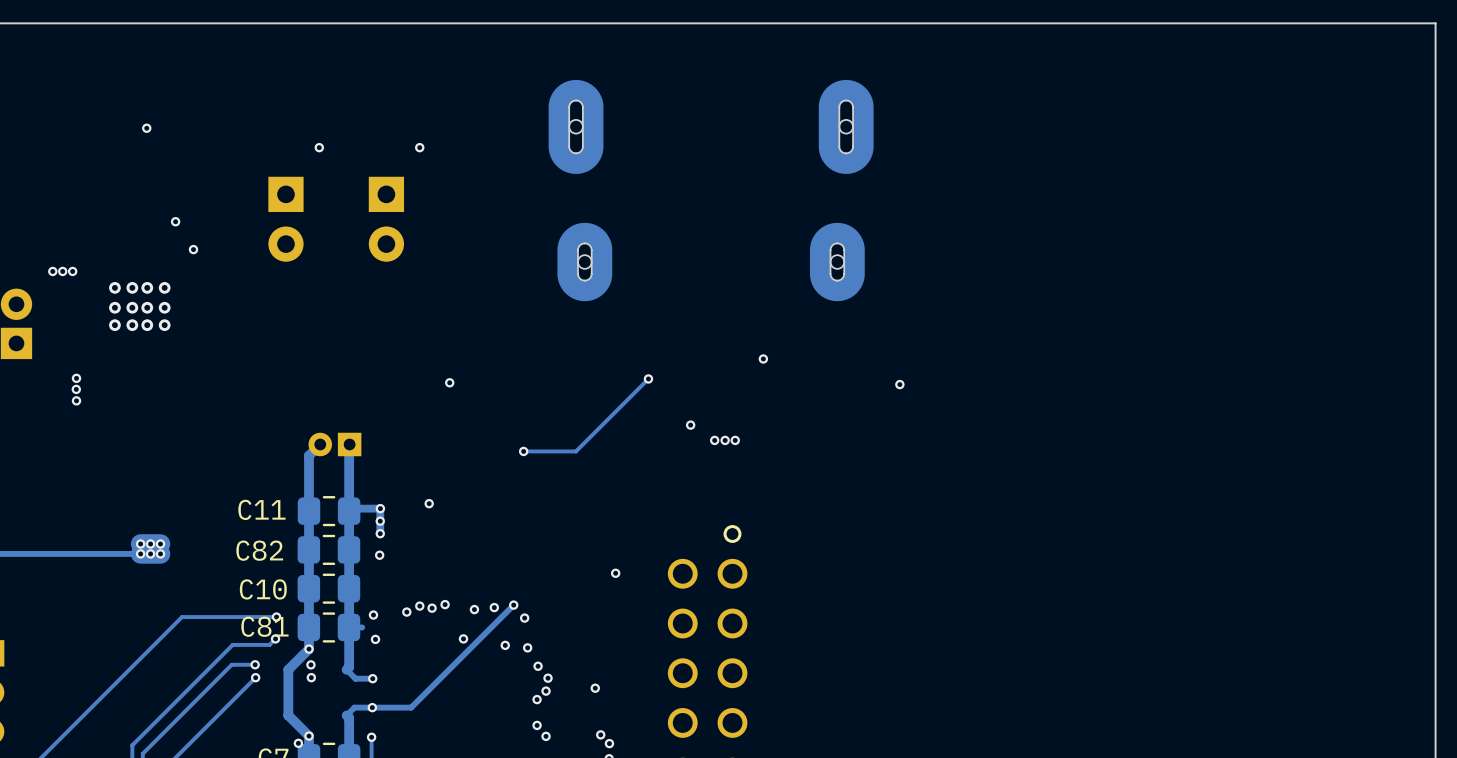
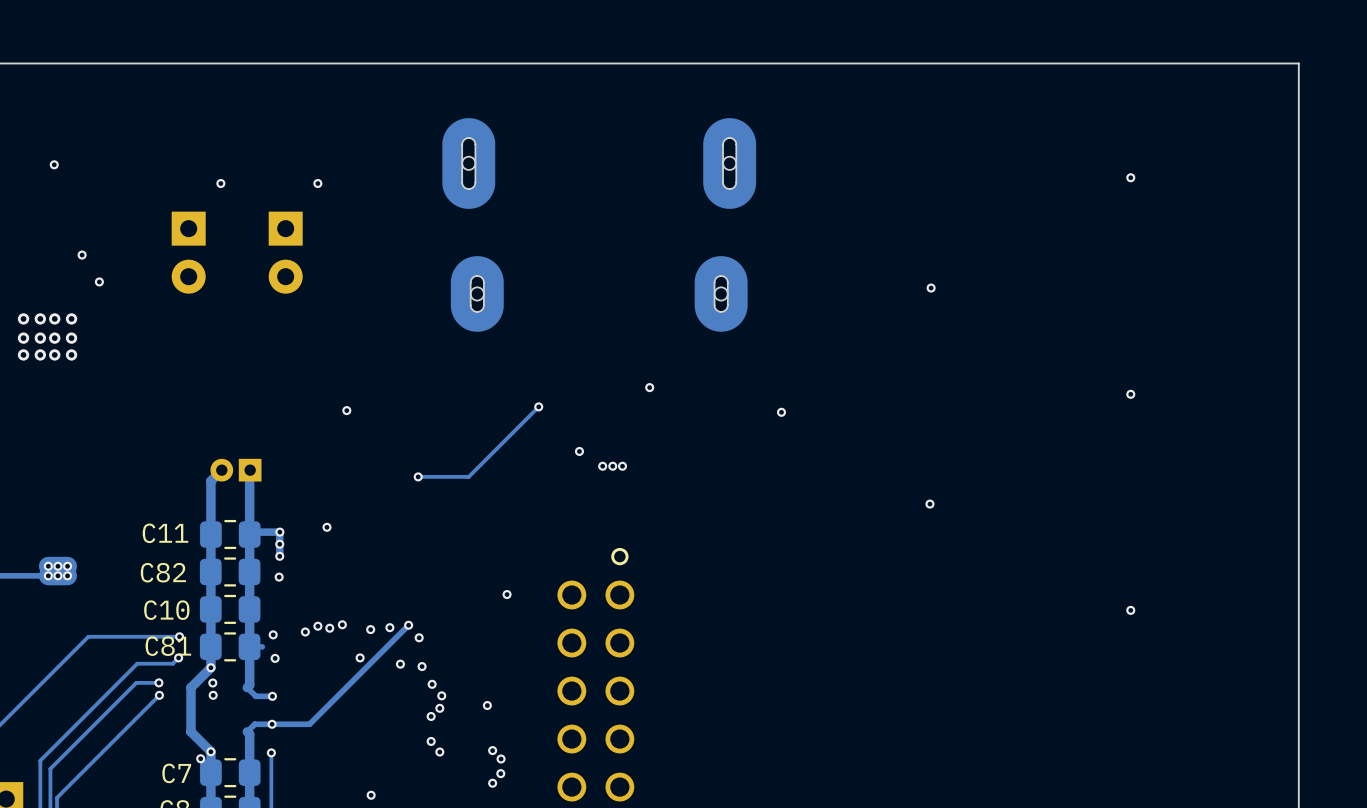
via: none -> (1130, 177)
via: none -> (931, 288)
via: none -> (1130, 394)
via: none -> (929, 504)
via: none -> (1130, 610)

